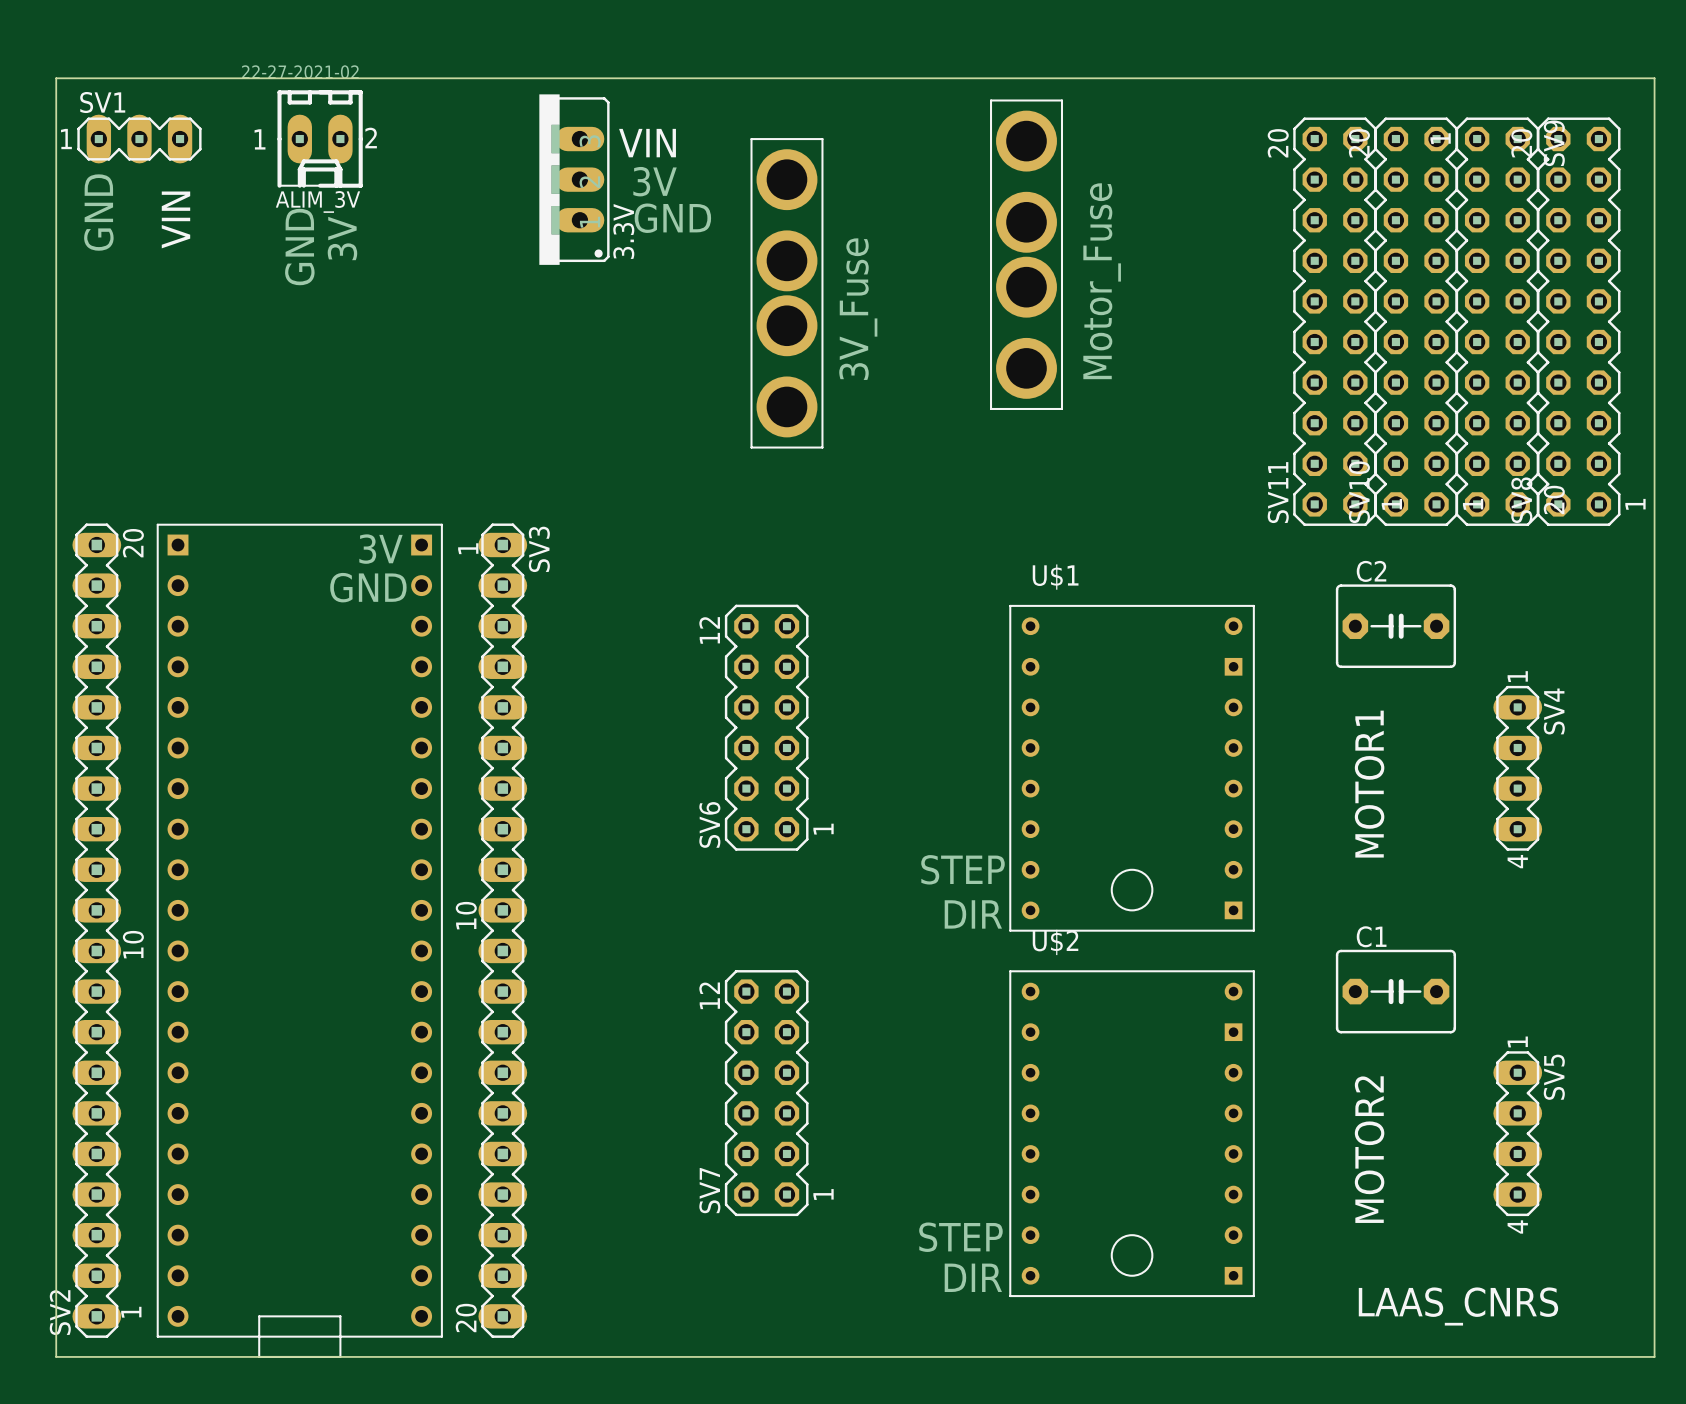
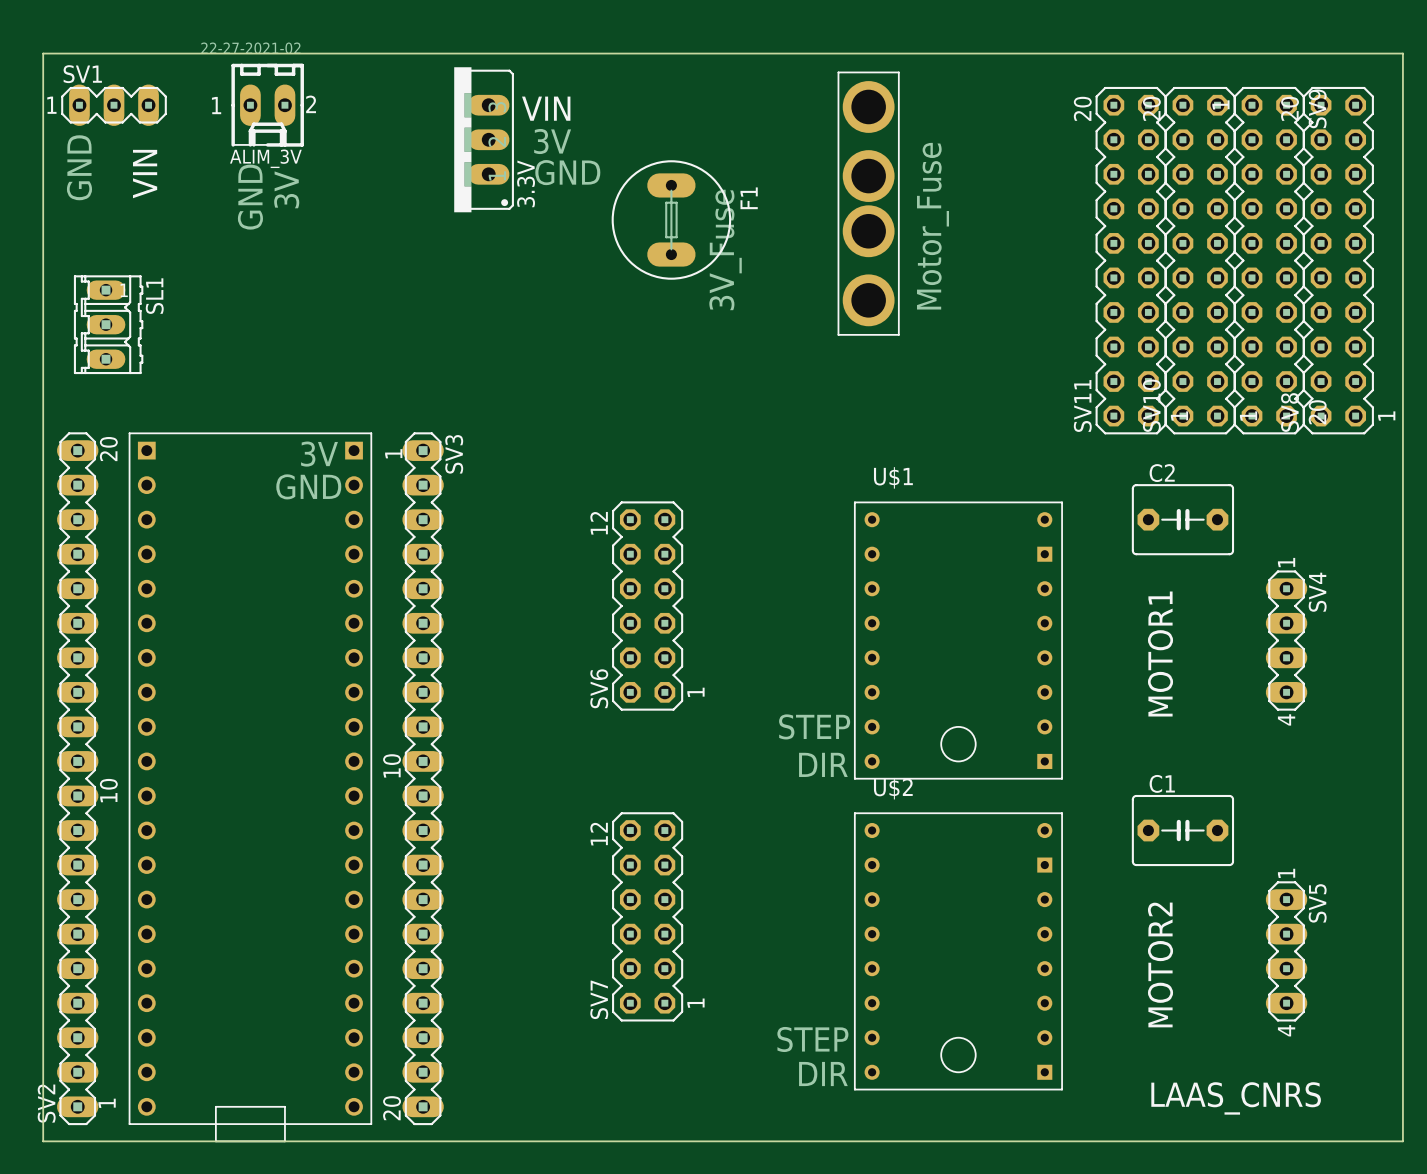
F1: none -> (671, 219)
part: (786, 293) -> none
SL1: none -> (108, 324)

